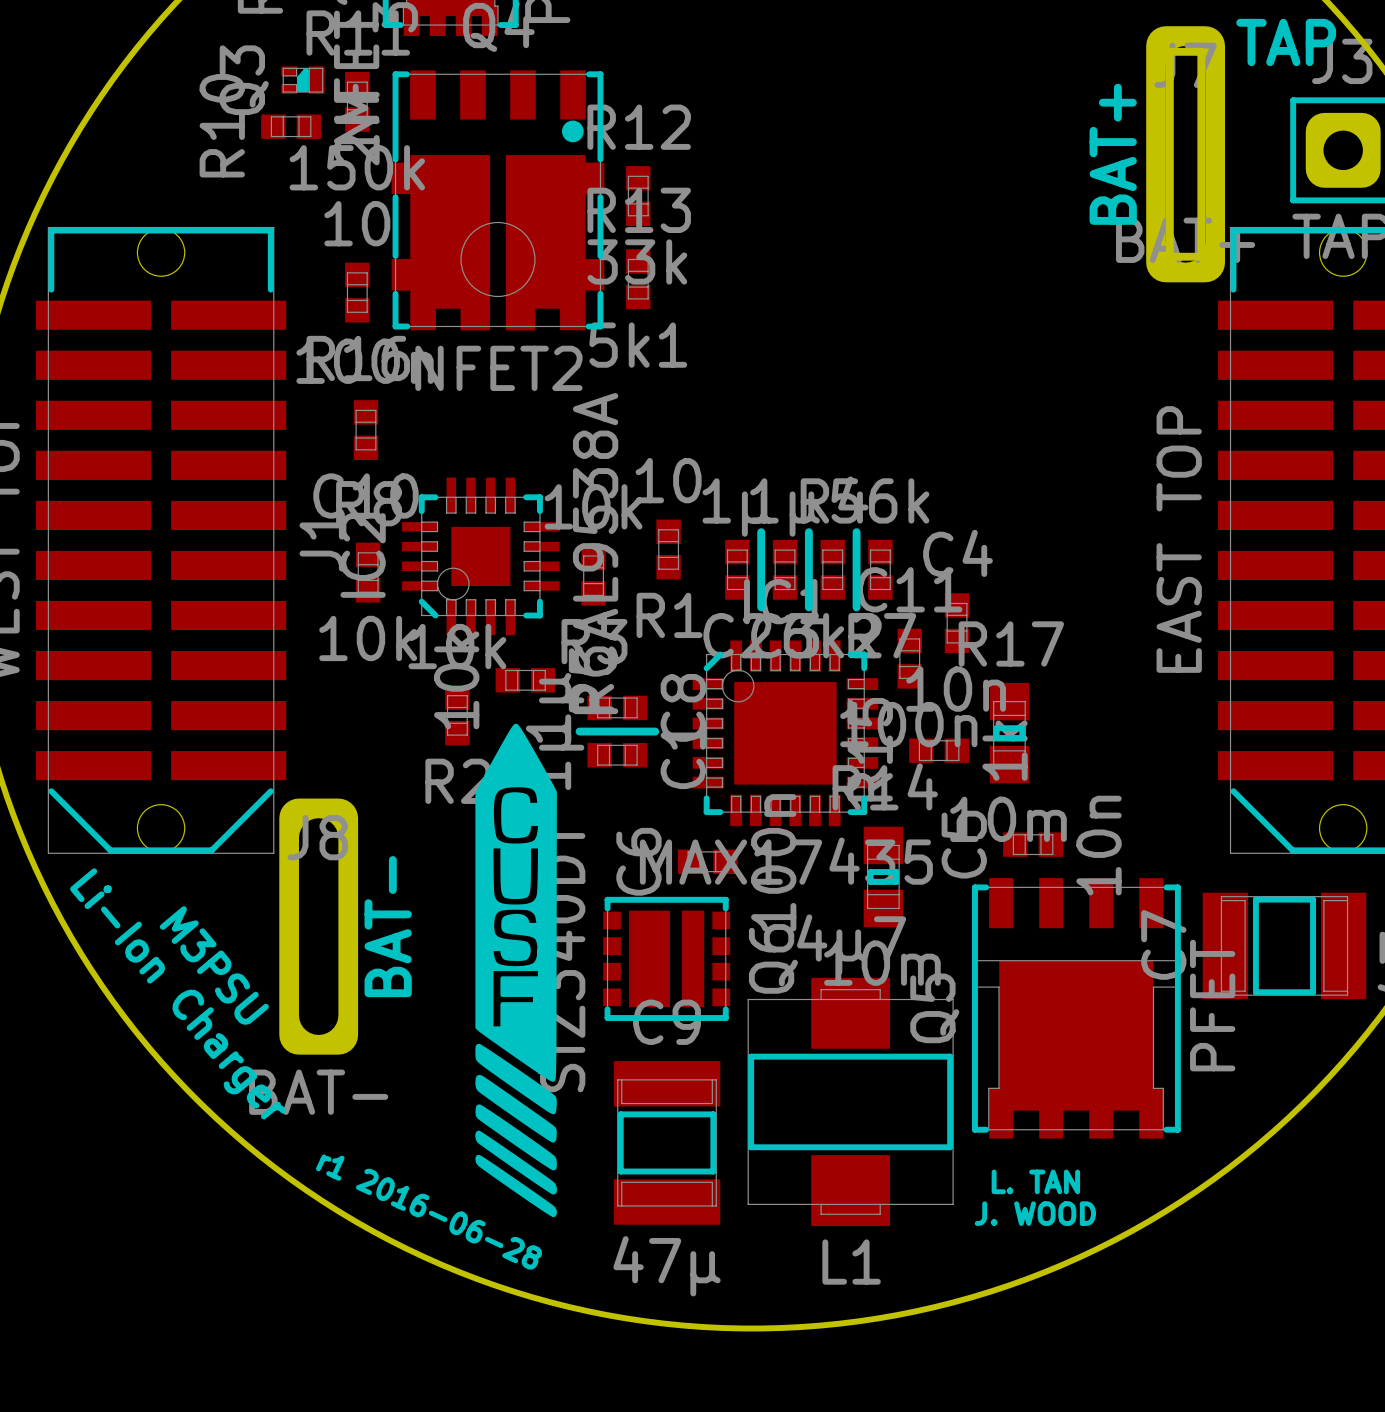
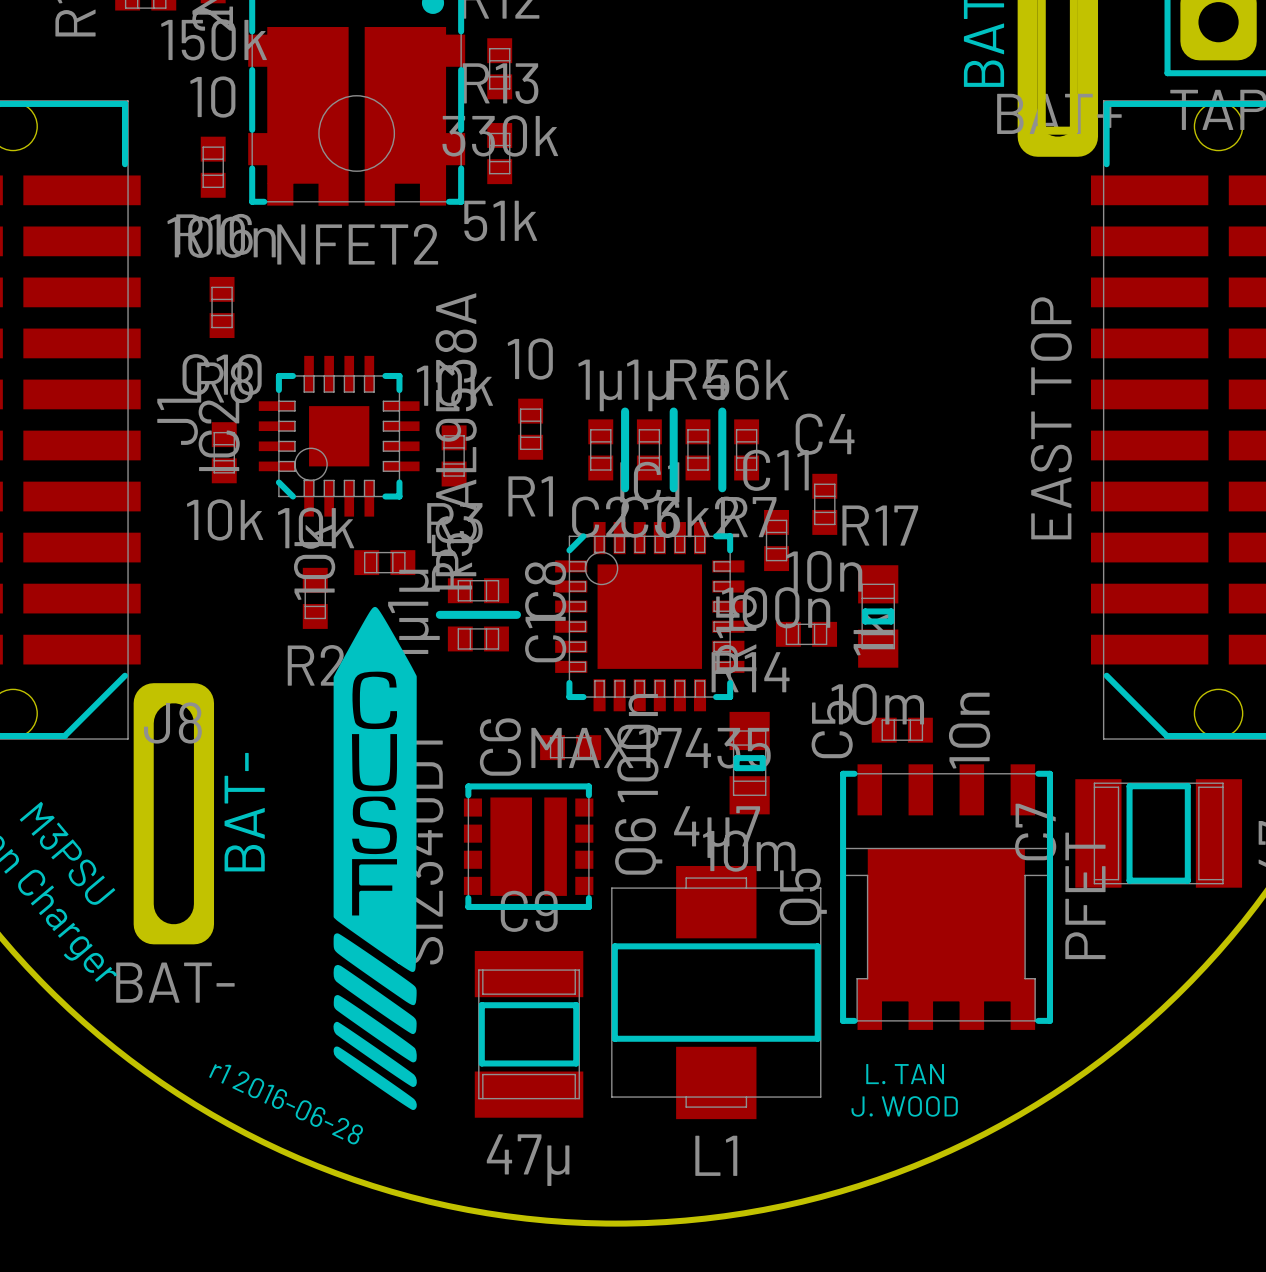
R12 value: 33k (637, 261) -> 330k (500, 136)
R13 value: 5k1 (638, 345) -> 51k (500, 220)

